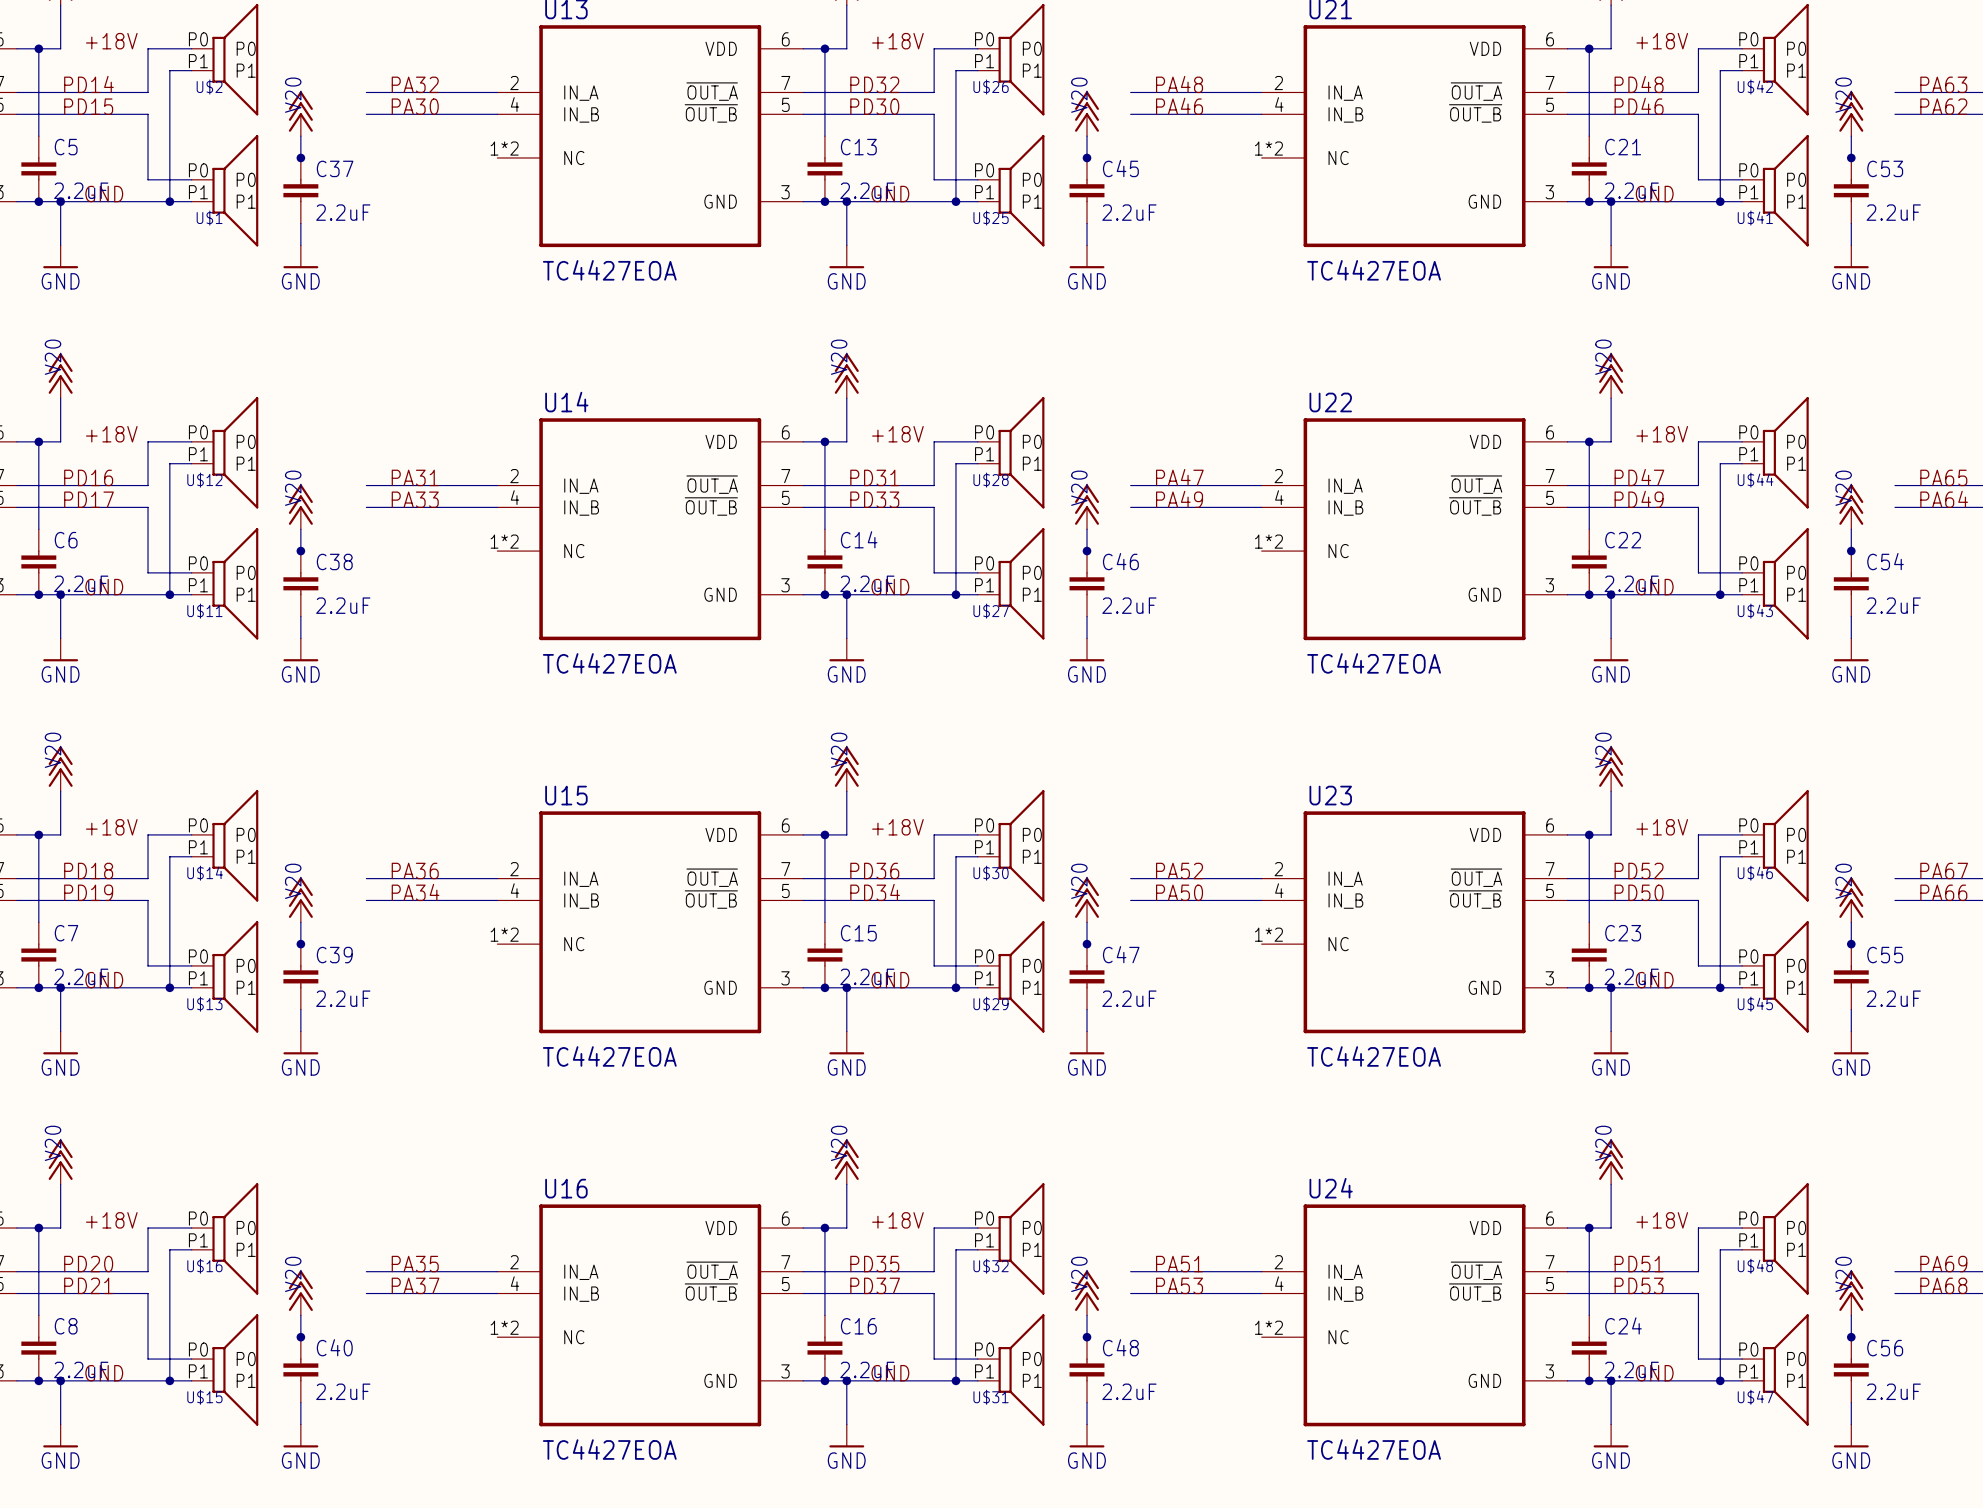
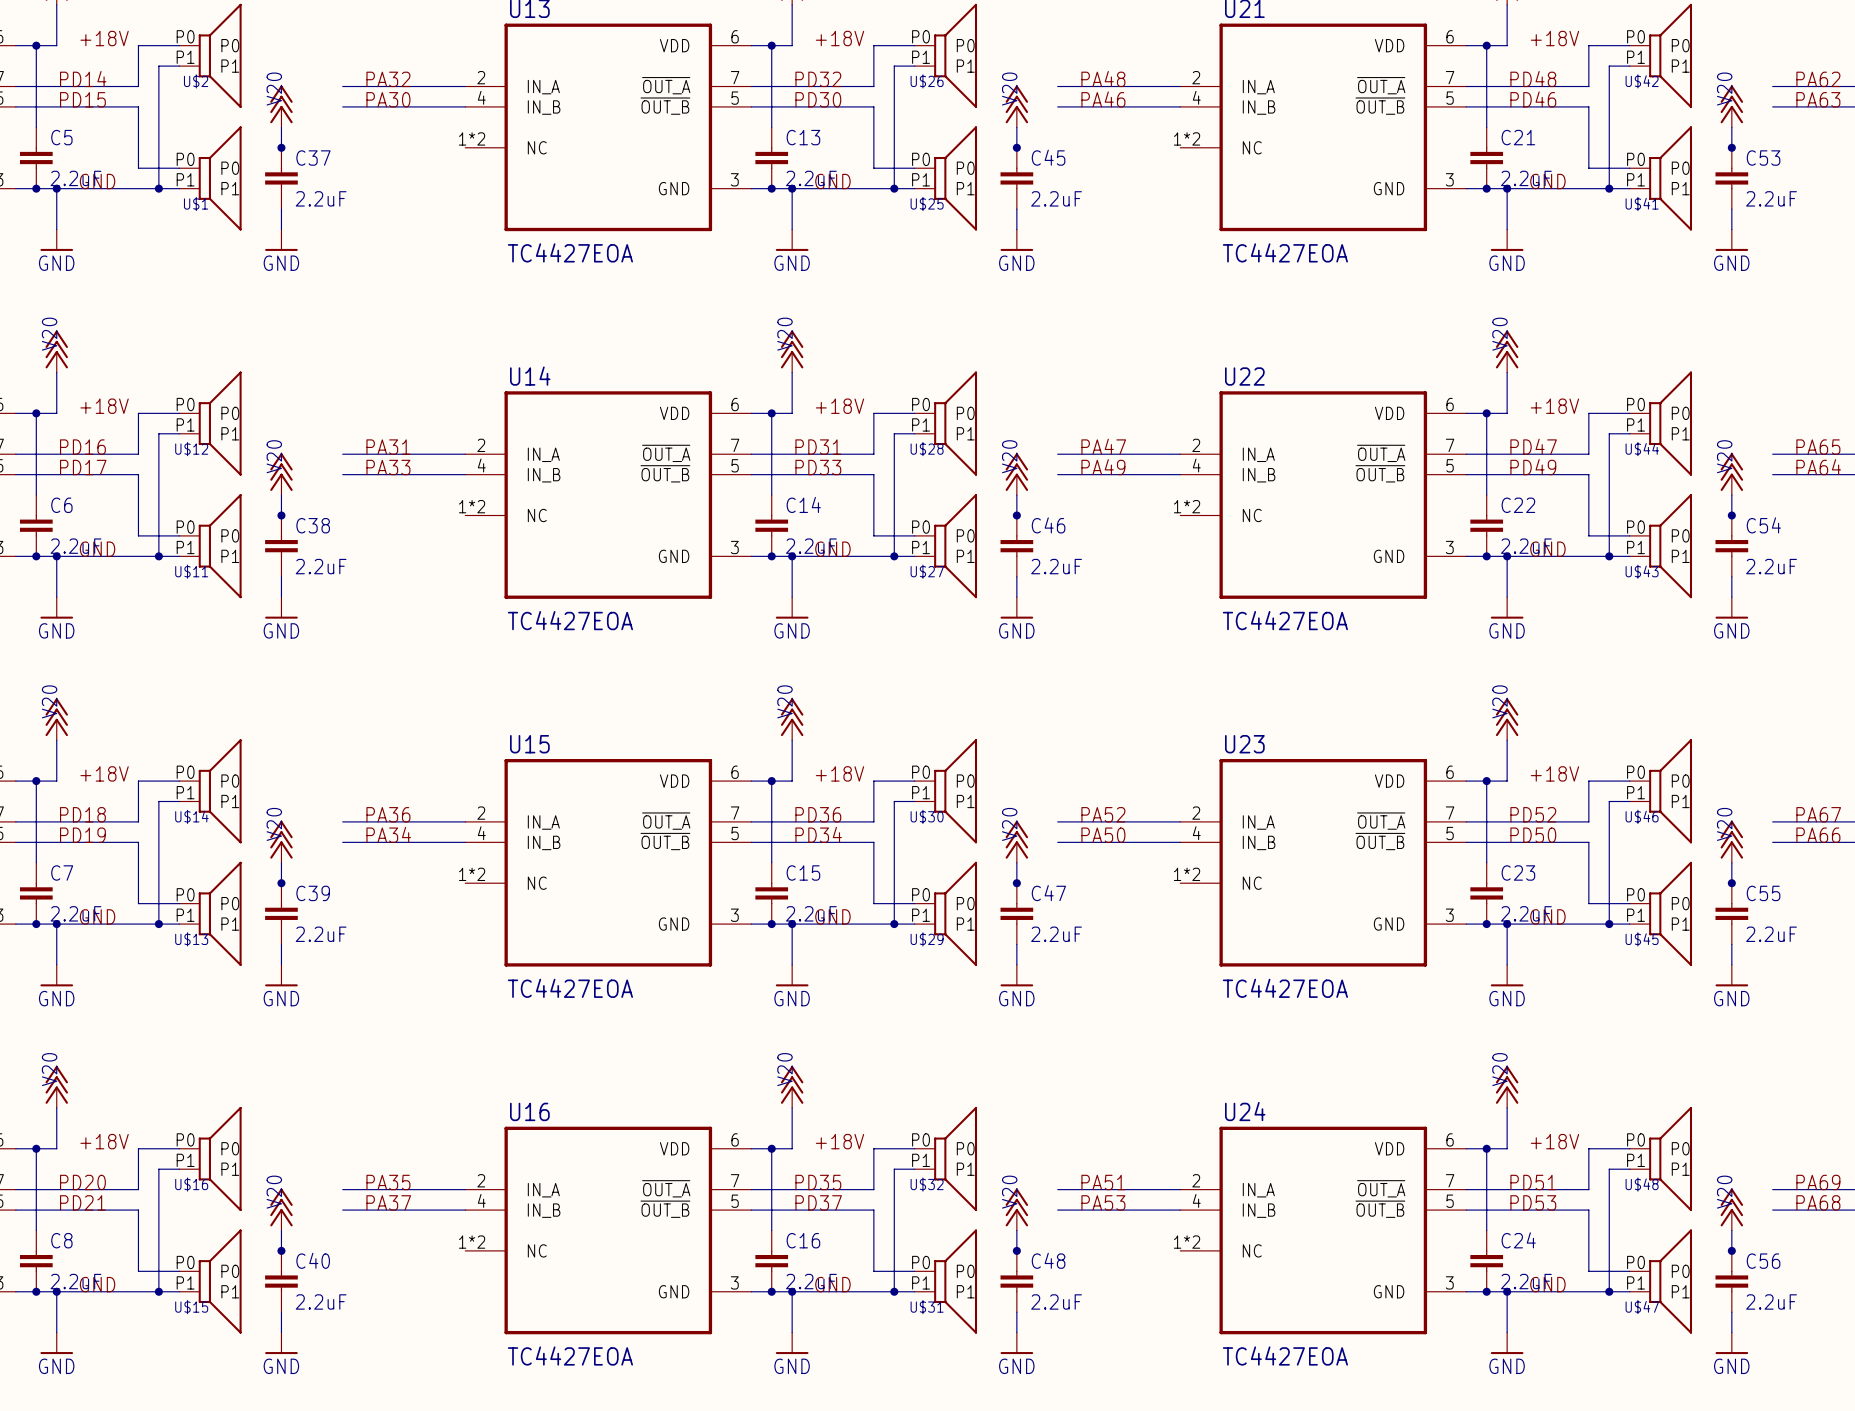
label: PA63 (1943, 84) -> PA62 (1818, 79)
label: PA62 (1943, 106) -> PA63 (1818, 99)

